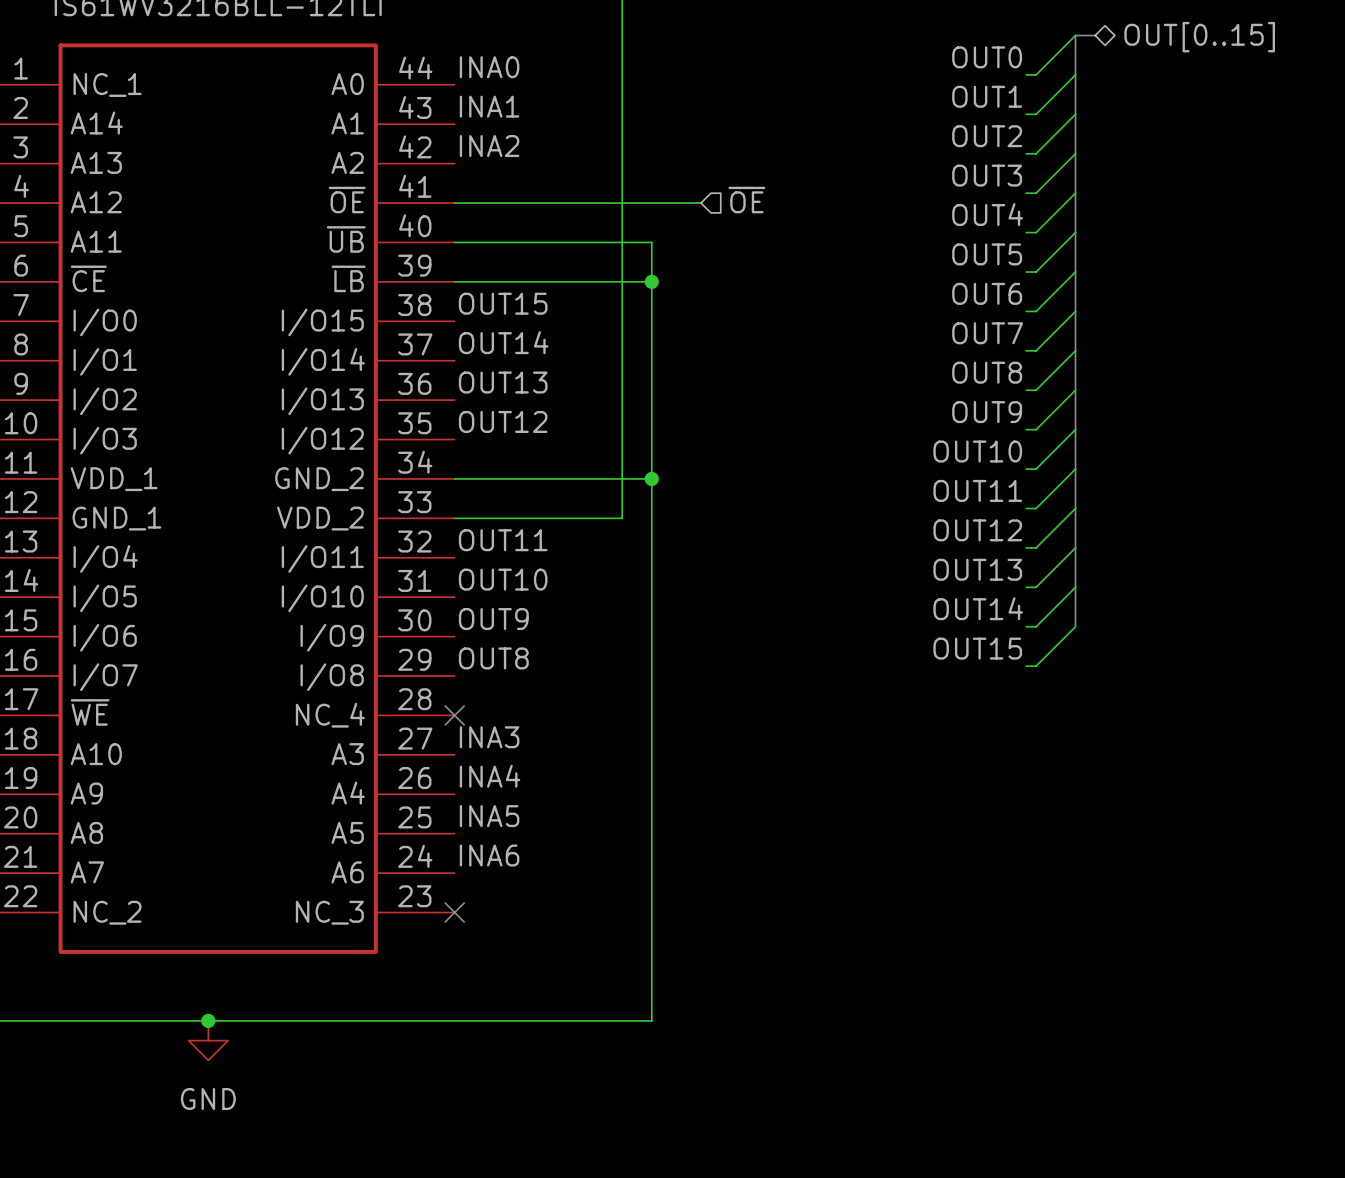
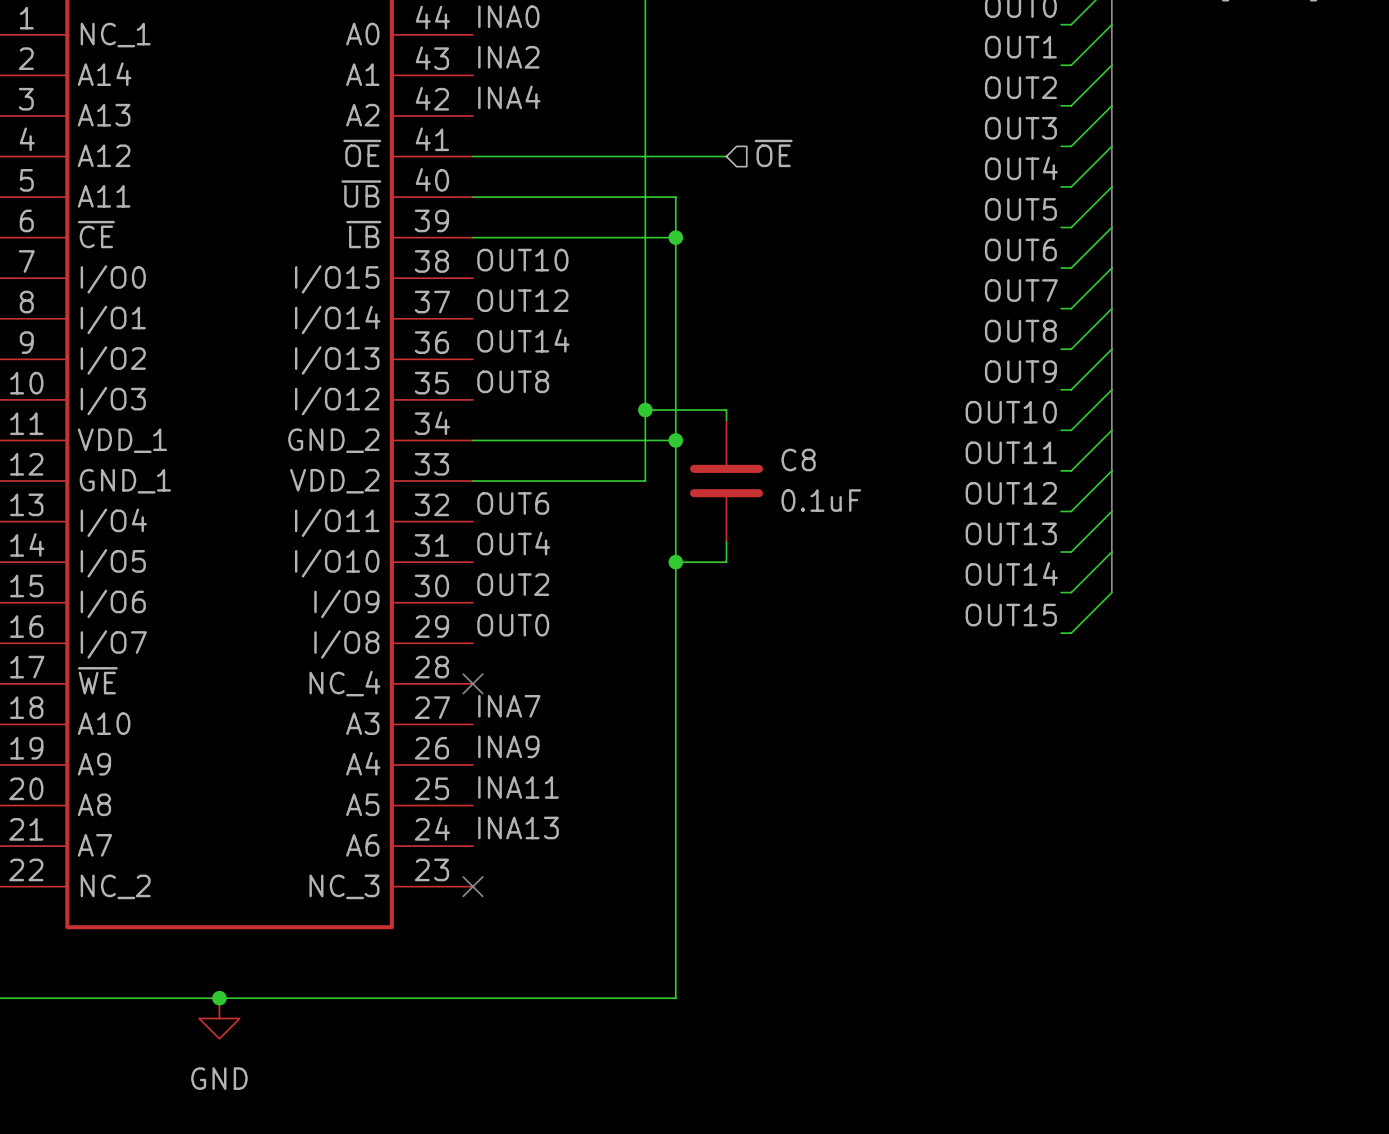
label: INA1 (489, 106) -> INA2 (508, 57)
label: INA2 (489, 146) -> INA4 (509, 97)
label: OUT15 (503, 303) -> OUT10 (522, 260)
label: OUT14 (503, 342) -> OUT12 (522, 300)
label: OUT13 (503, 382) -> OUT14 (523, 340)
label: OUT12 (503, 421) -> OUT8 (513, 381)
wire: none -> (645, 410) (726, 410) (726, 420)
junction: none -> (645, 410)
C8: none -> 0.1uF (726, 481)
label: OUT11 (503, 540) -> OUT6 (513, 503)
wire: none -> (726, 541) (726, 562) (675, 562)
label: OUT10 (503, 579) -> OUT4 (513, 543)
junction: none -> (675, 562)
label: OUT9 (493, 619) -> OUT2 (513, 584)
label: OUT8 (493, 658) -> OUT0 (513, 625)
label: INA3 (489, 737) -> INA7 (509, 706)
label: INA4 (490, 776) -> INA9 (508, 746)
label: INA5 (489, 816) -> INA11 (518, 787)
label: INA6 (489, 855) -> INA13 (518, 828)

